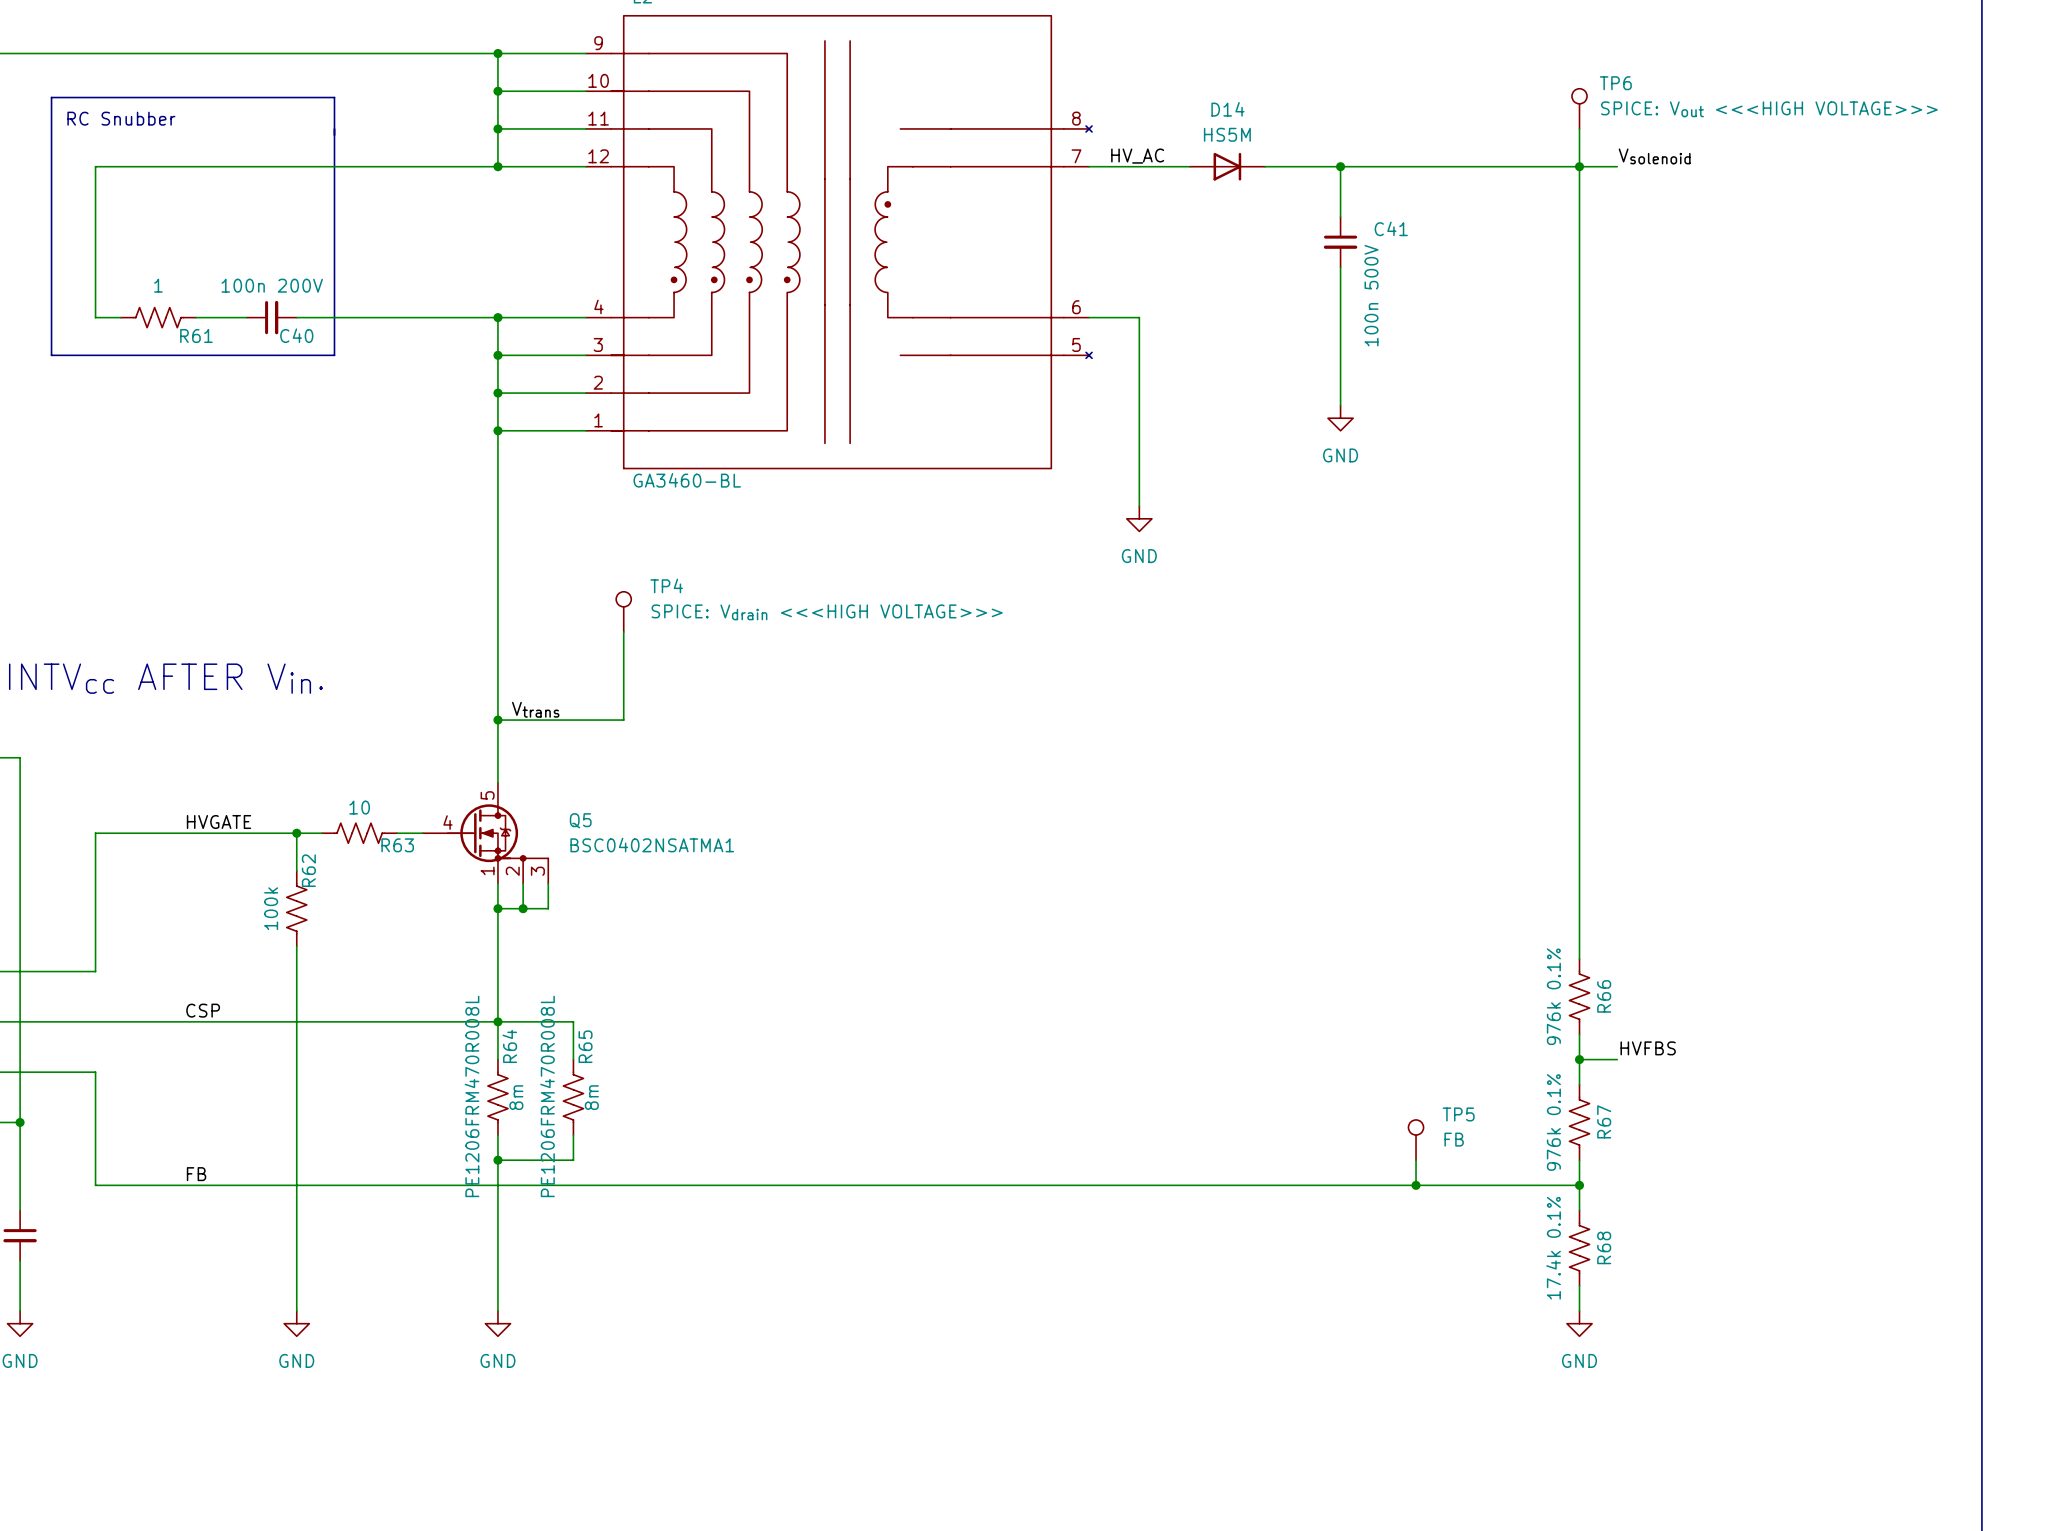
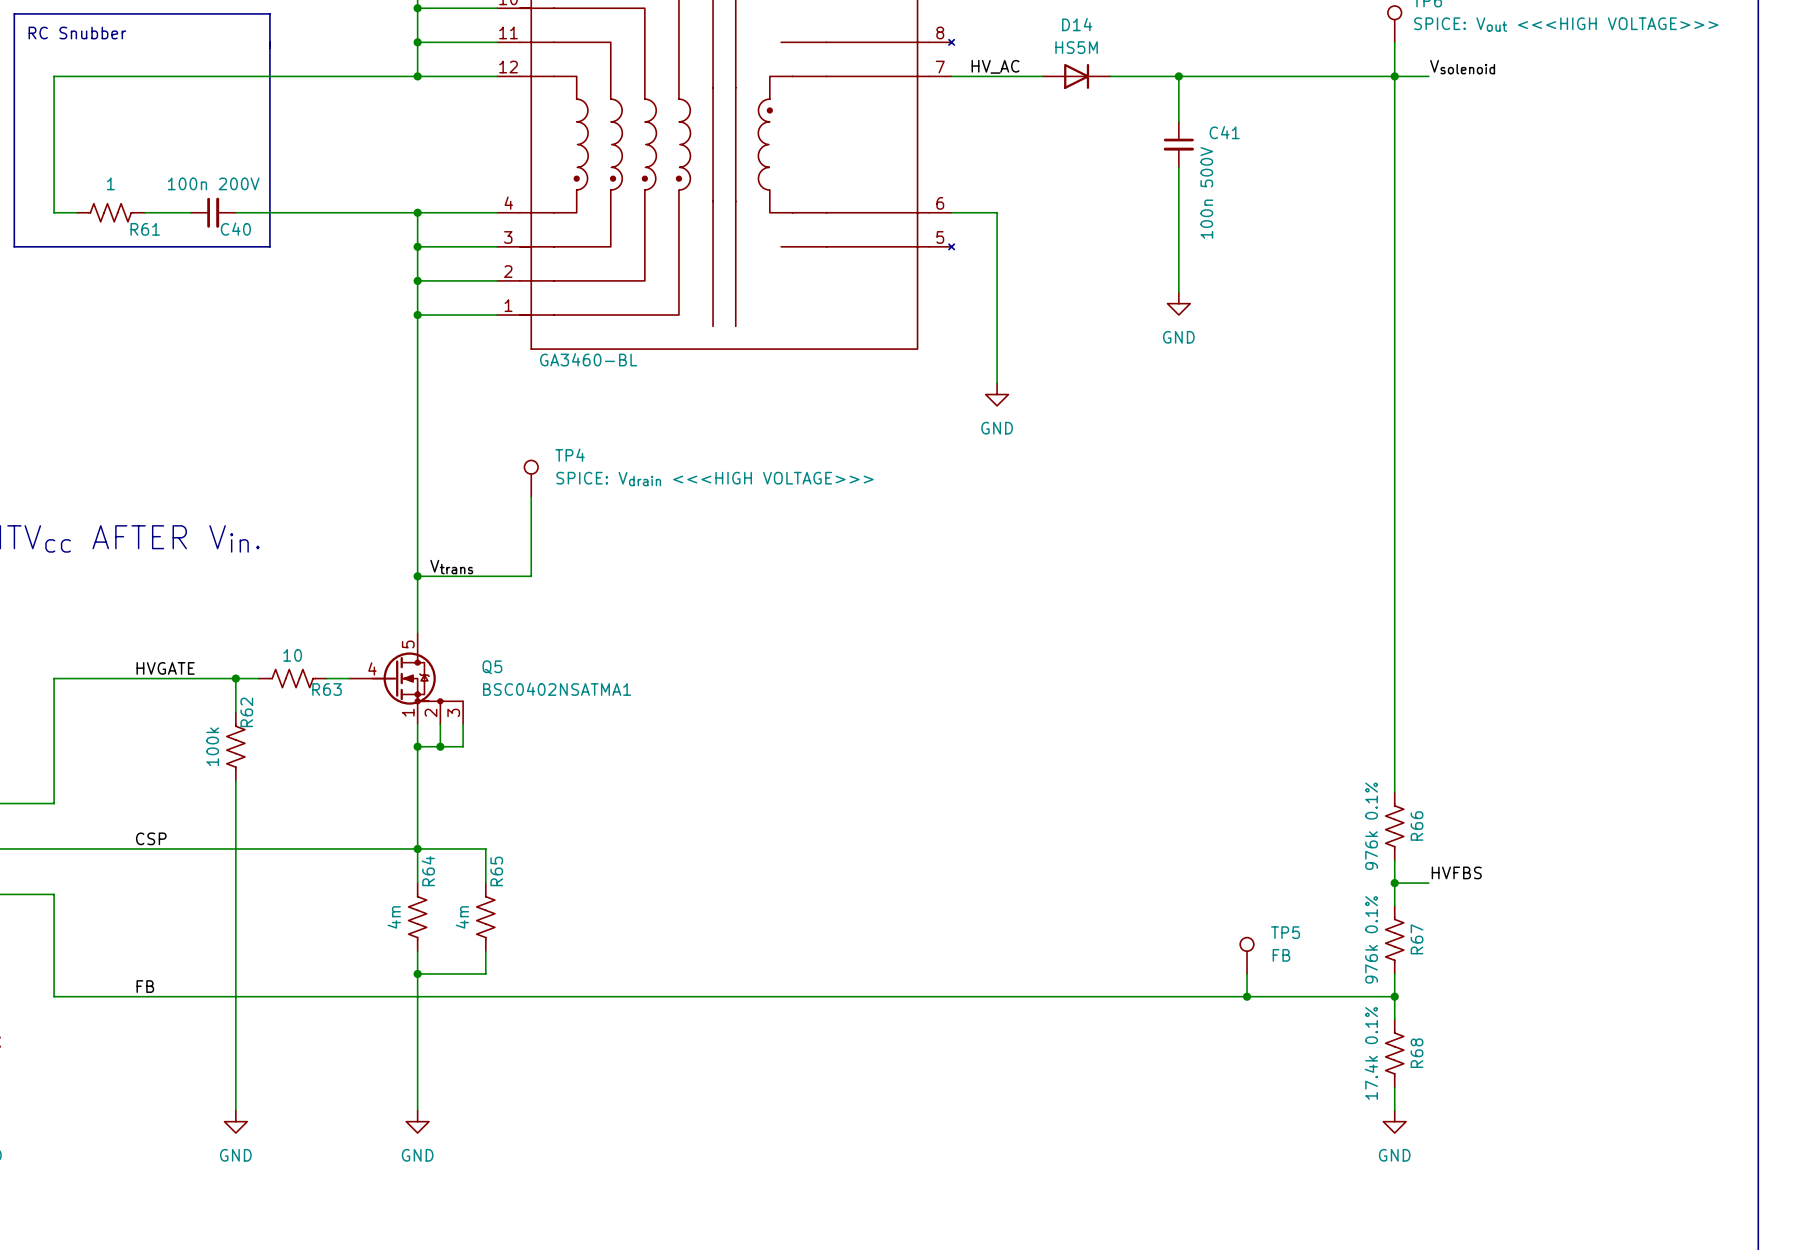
R64 value: PE1206FRM470R008L (472, 1096) -> 4m (394, 917)
R65 value: PE1206FRM470R008L (547, 1096) -> 4m (462, 917)
R64 text: 8m (516, 1097) -> none
R65 text: 8m (591, 1097) -> none

